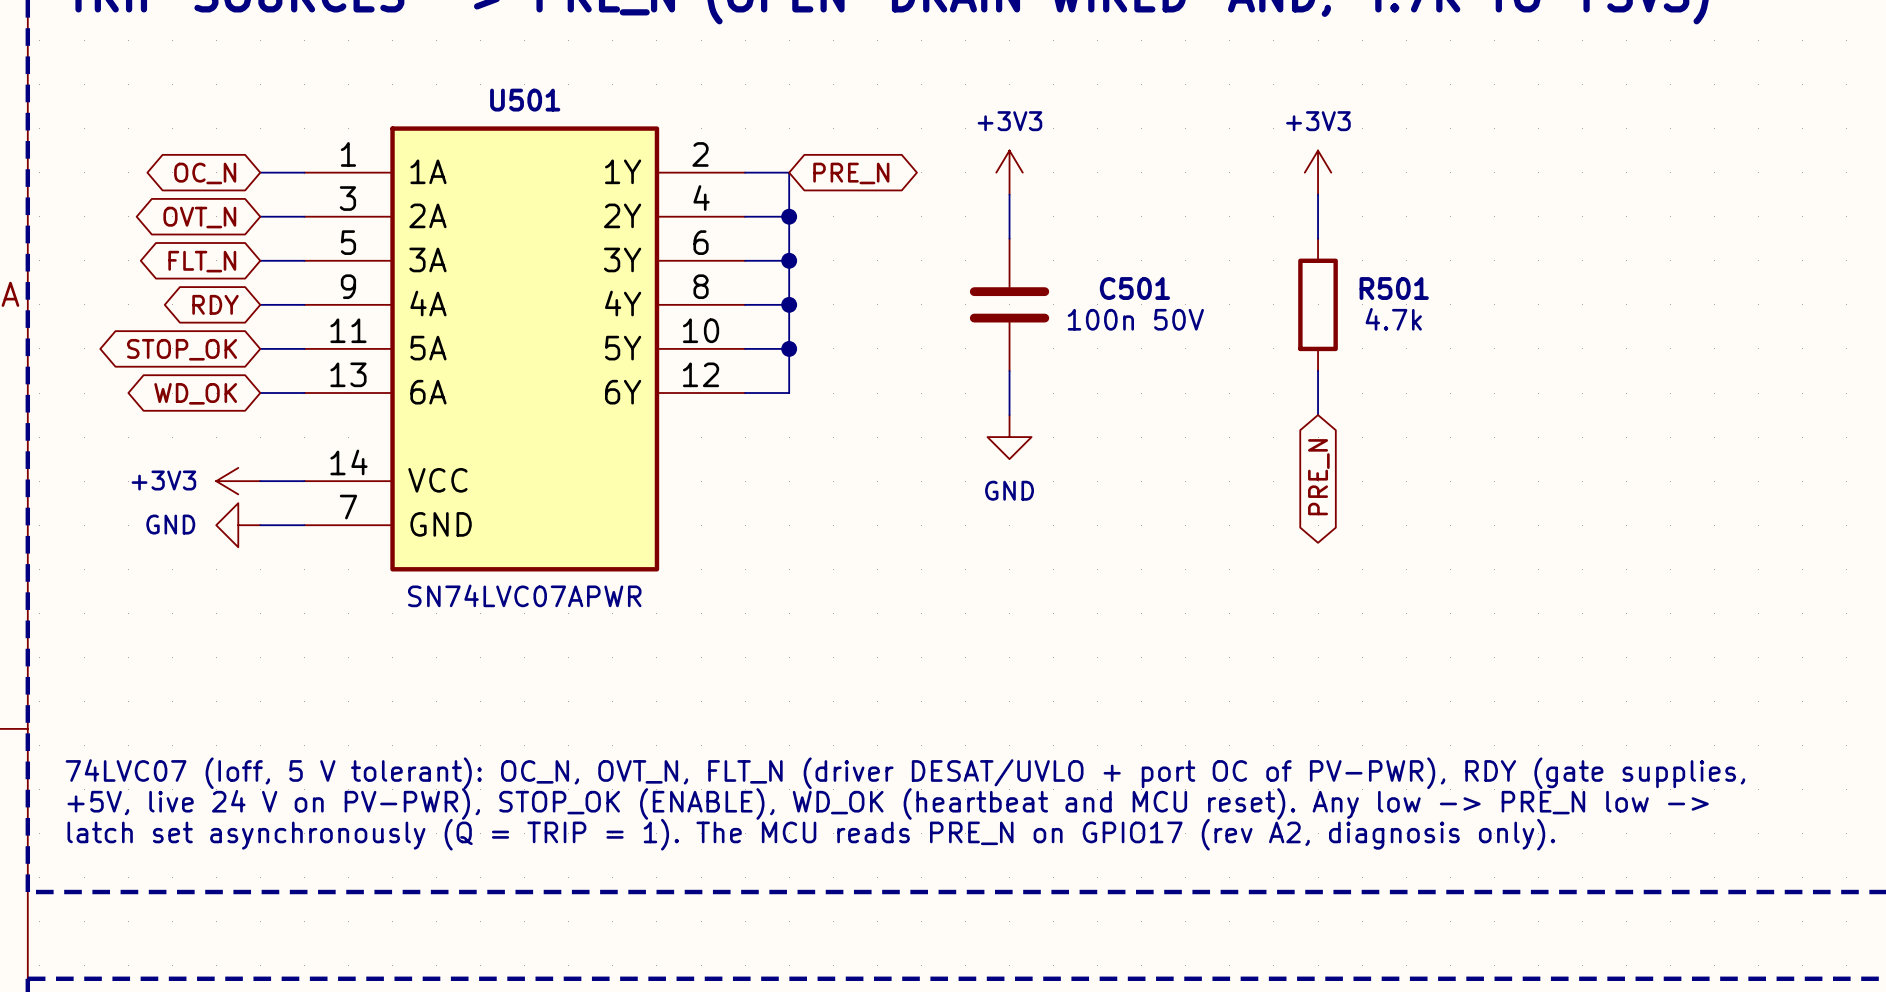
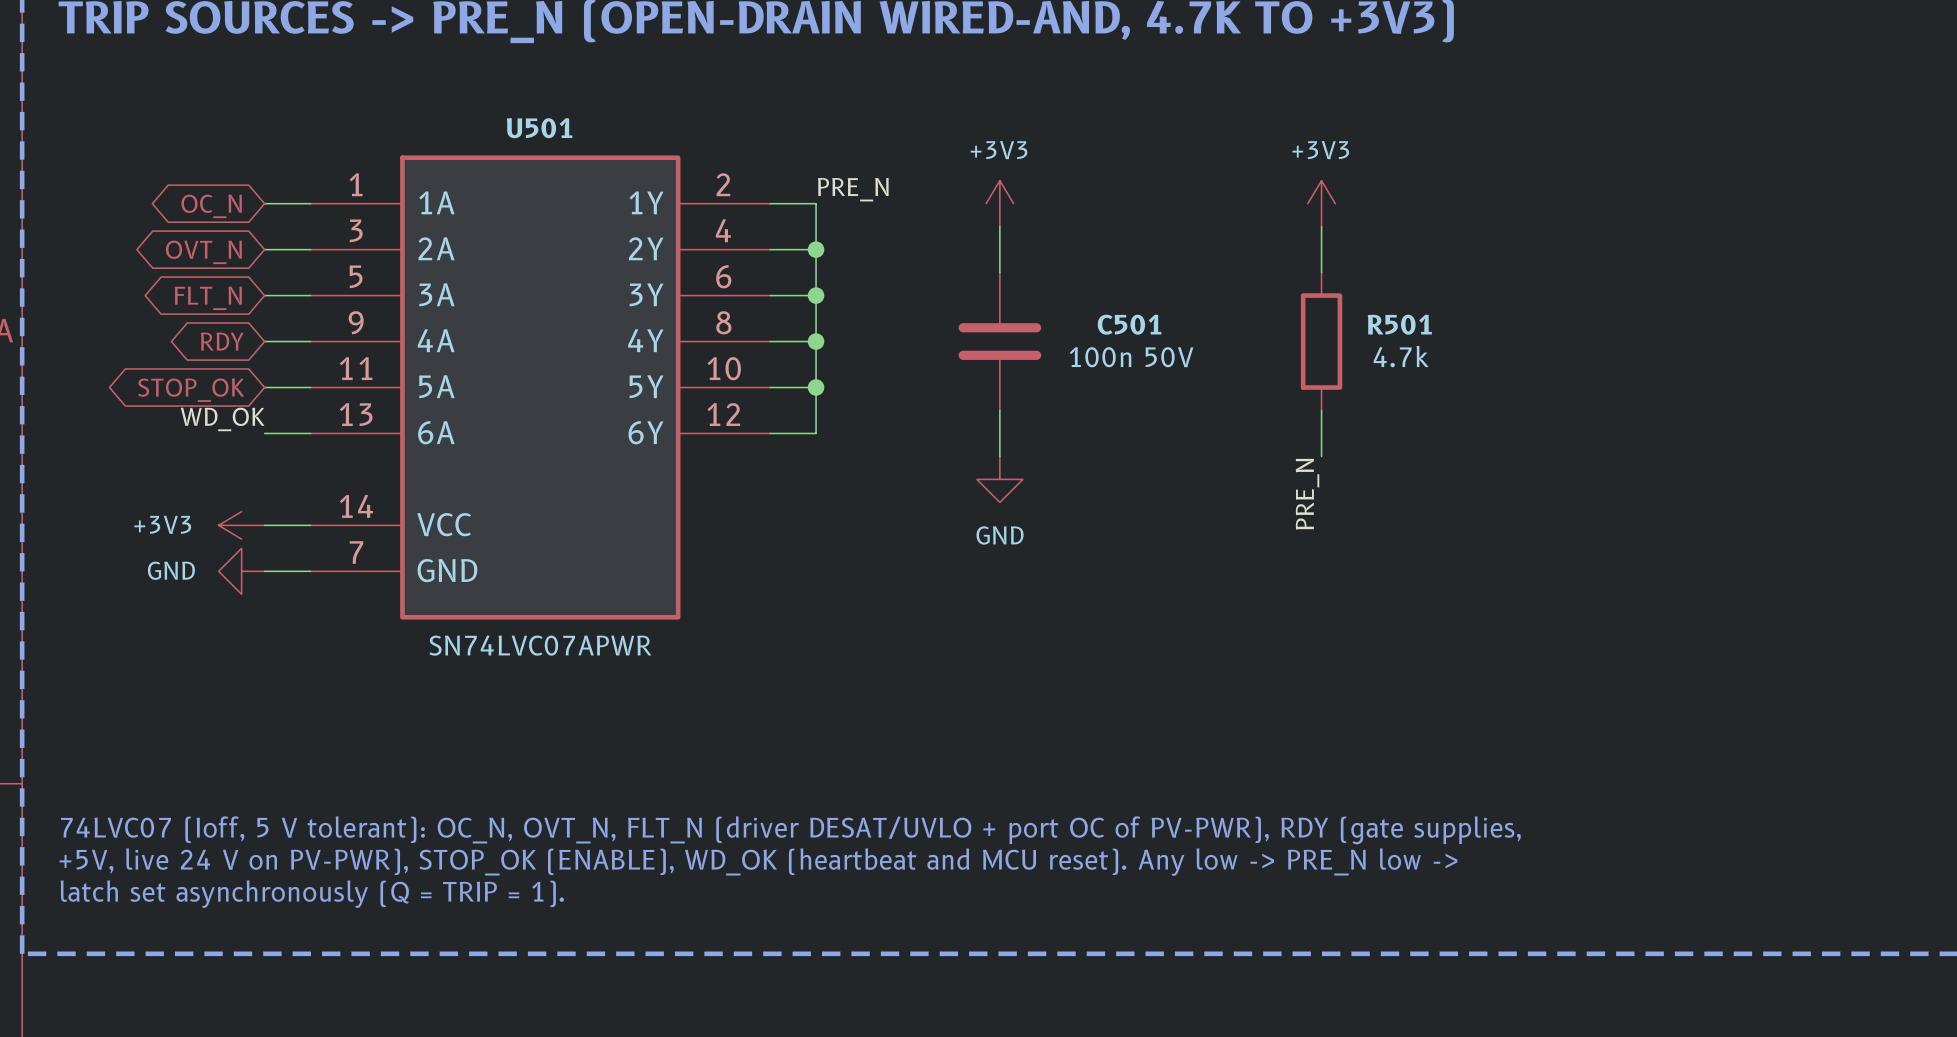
label: none -> PRE_N (853, 189)
power symbol position: +3V3 (1009, 172) -> +3V3 (999, 203)
power symbol position: +3V3 (1318, 172) -> +3V3 (1321, 203)
global label: PRE_N (851, 173) -> none
wire: (1009, 194) (1009, 238) -> (999, 226) (999, 272)
wire: (1318, 194) (1318, 238) -> (1321, 226) (1321, 272)
C501 position: (1009, 304) -> (999, 341)
R501 position: (1318, 304) -> (1321, 341)
wire: (1009, 370) (1009, 415) -> (999, 410) (999, 456)
wire: (1318, 370) (1318, 415) -> (1321, 410) (1321, 456)
label: none -> WD_OK (222, 419)
global label: WD_OK (195, 393) -> none
power symbol position: GND (1009, 437) -> GND (999, 479)
label: none -> PRE_N (1307, 494)
global label: PRE_N (1318, 477) -> none
text: latch set asynchronously (Q = TRIP = 1). The MCU reads PRE_N on GPIO17 (rev A2, diagnosis only). (811, 834) -> latch set asynchronously (Q = TRIP = 1). (312, 894)

